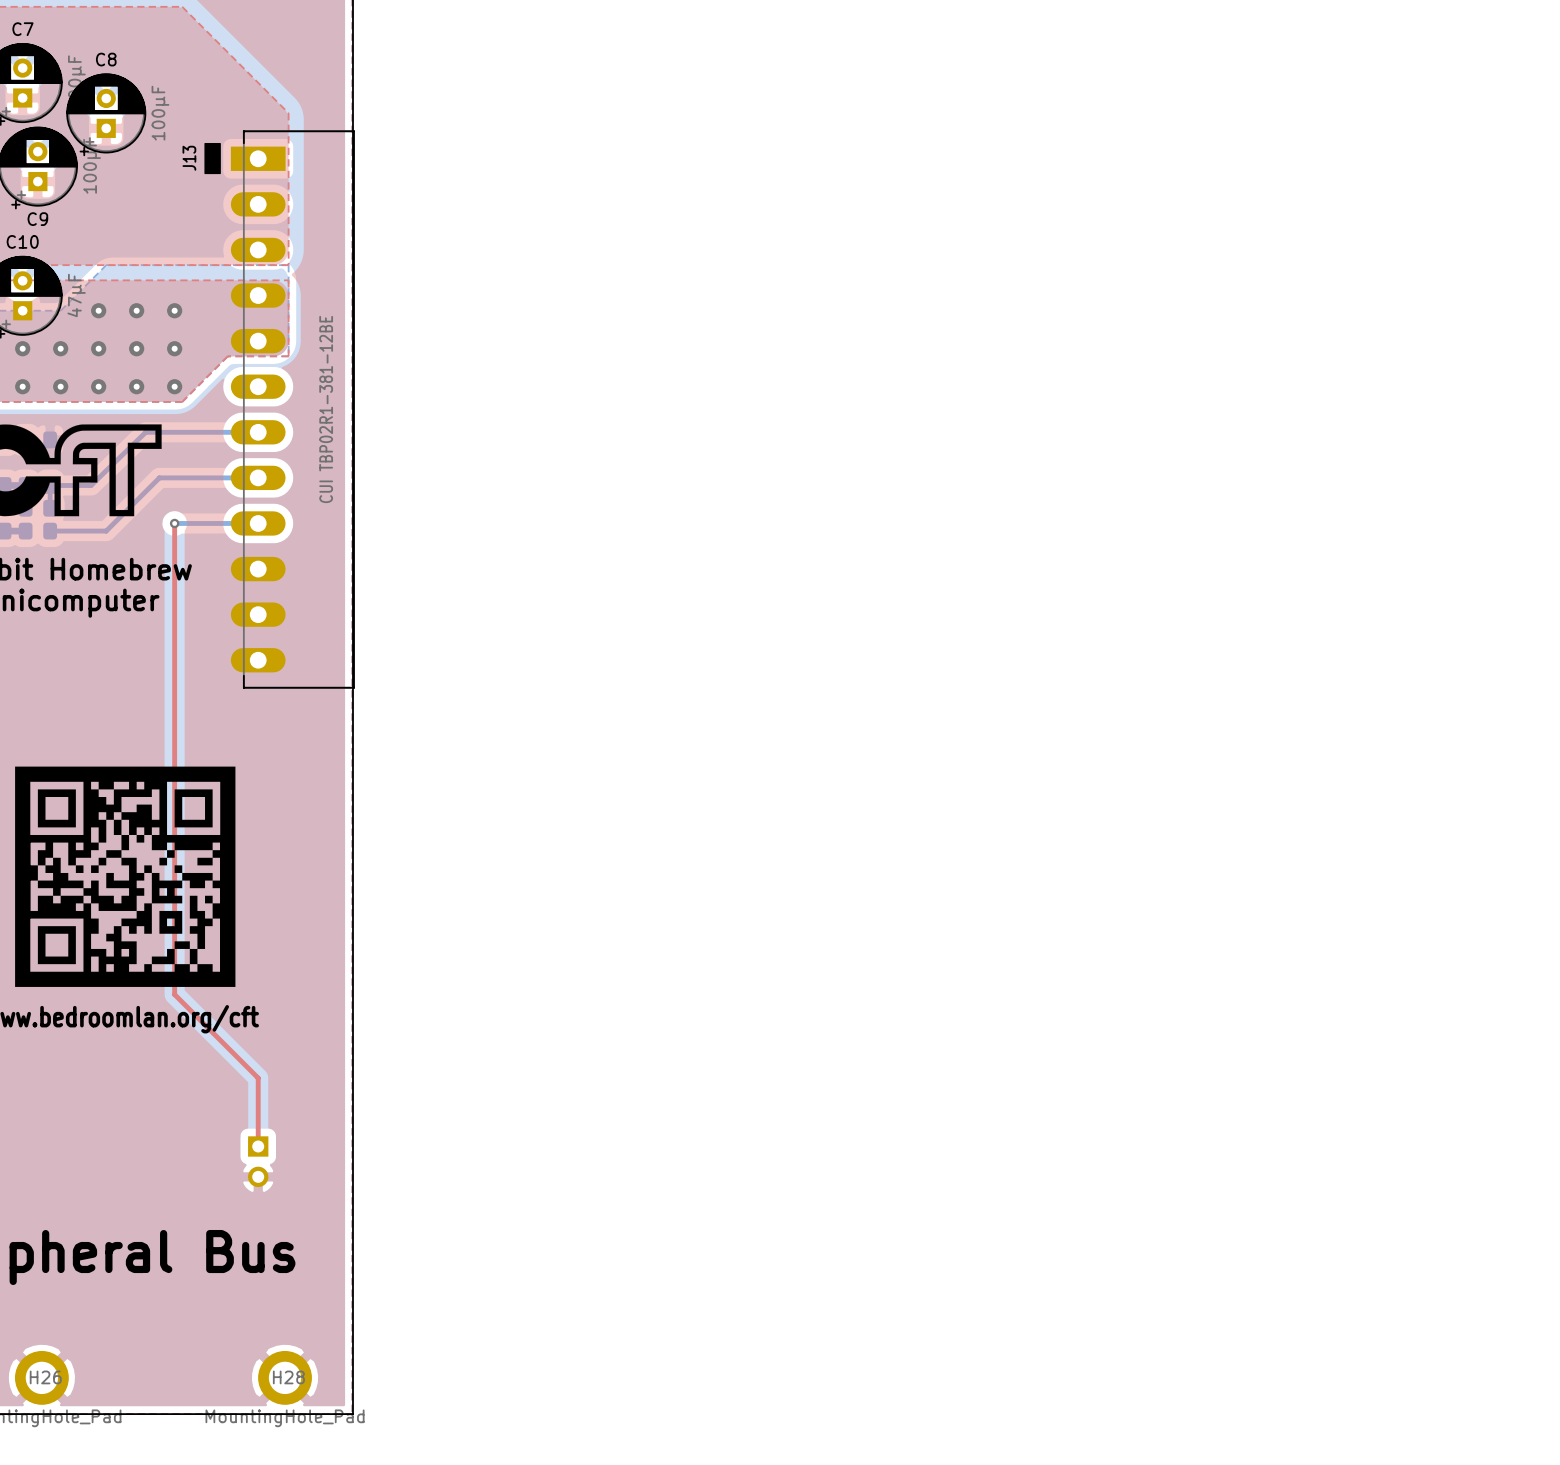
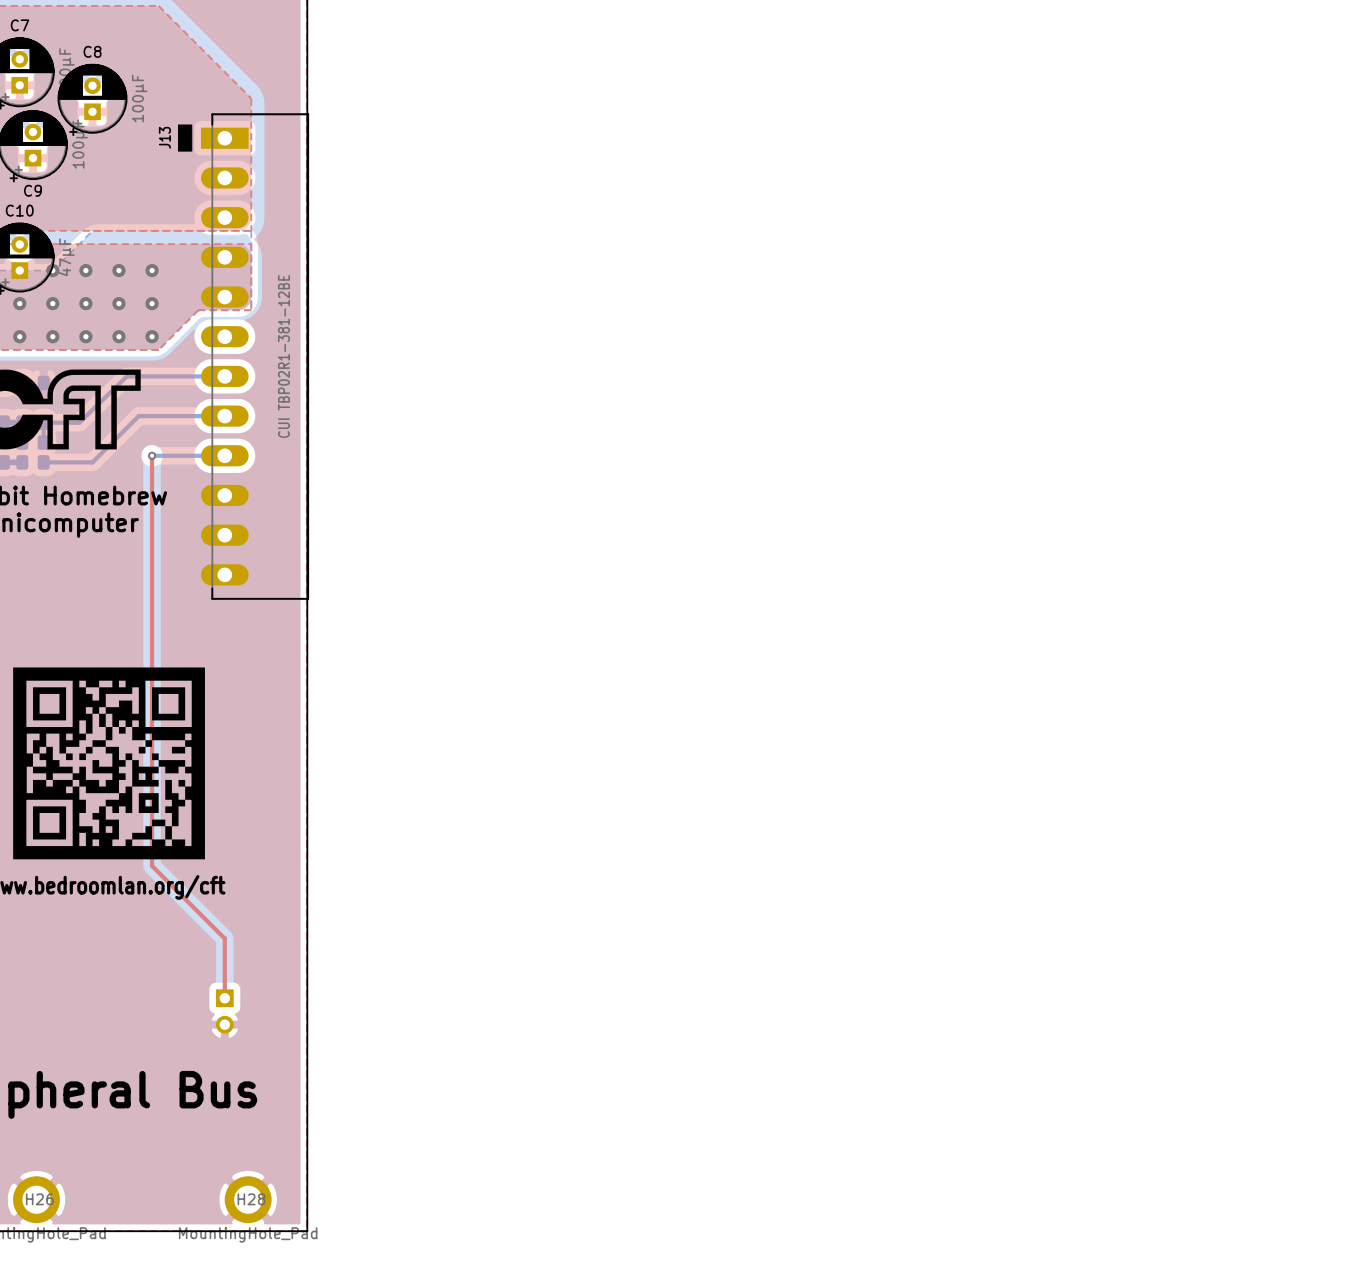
via: none -> (52, 270)

